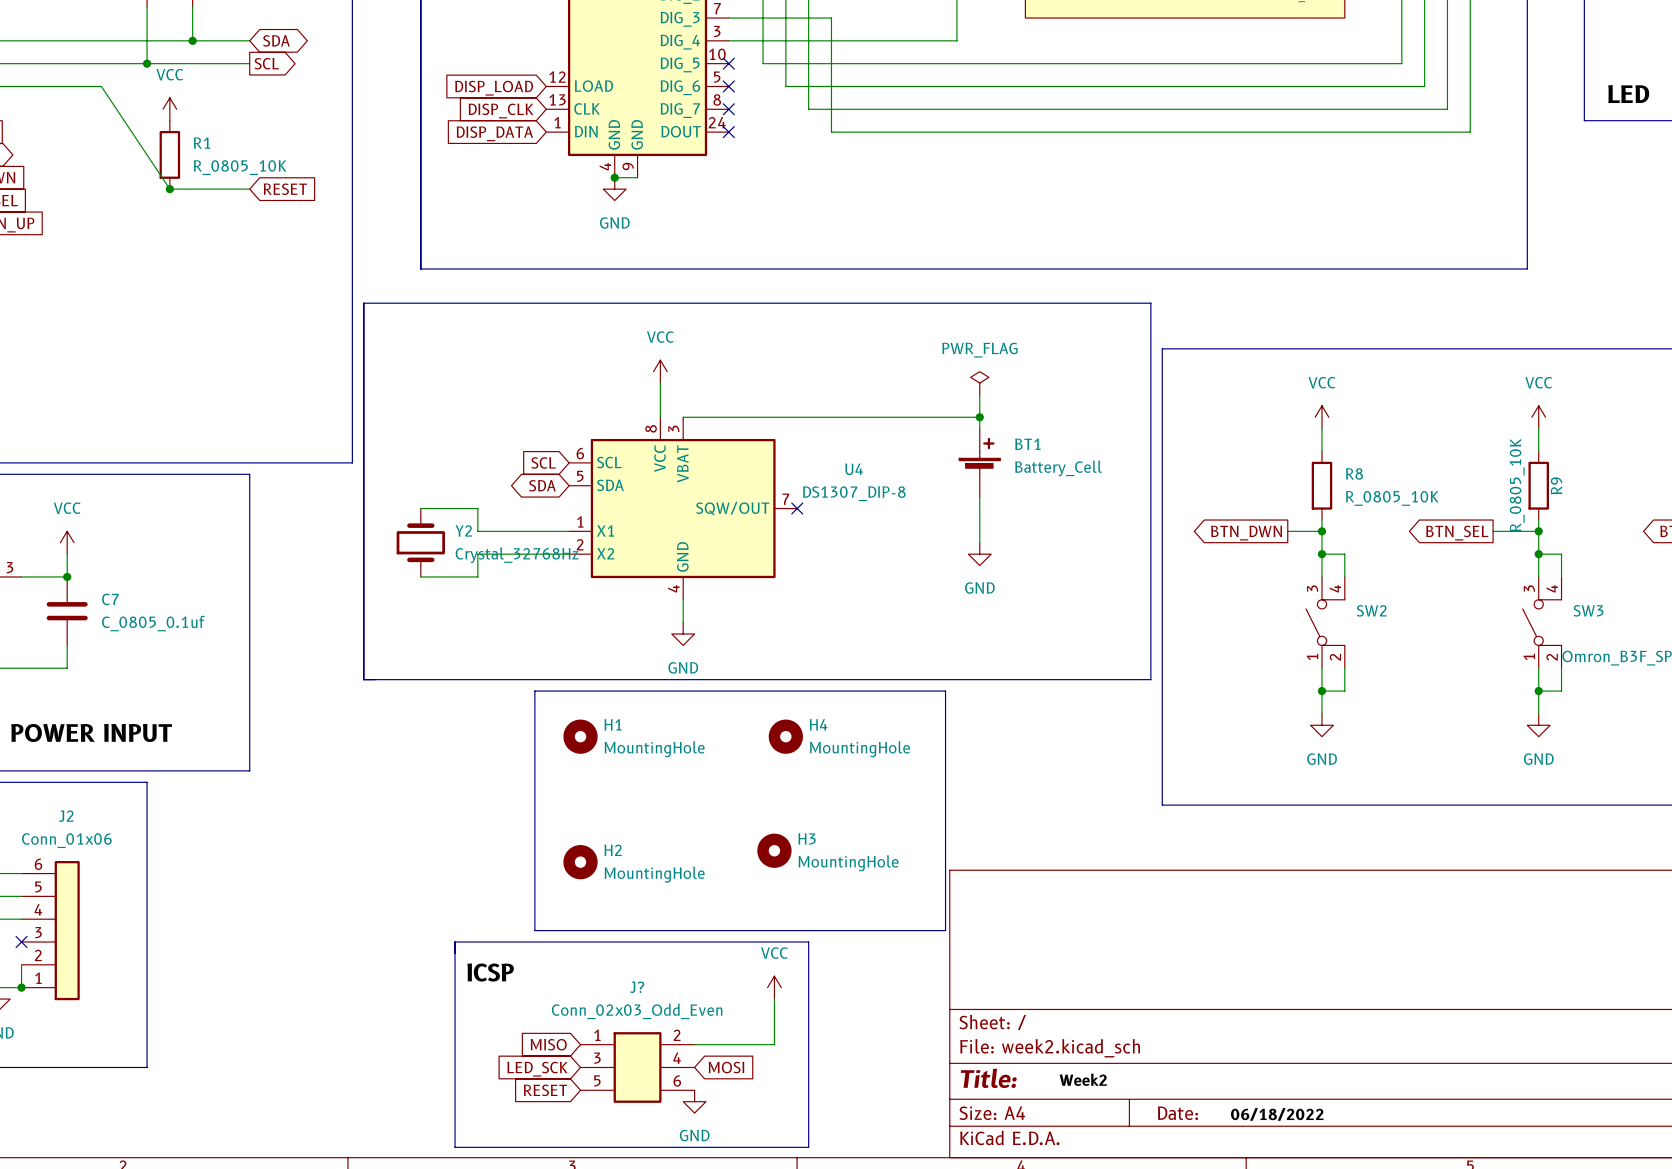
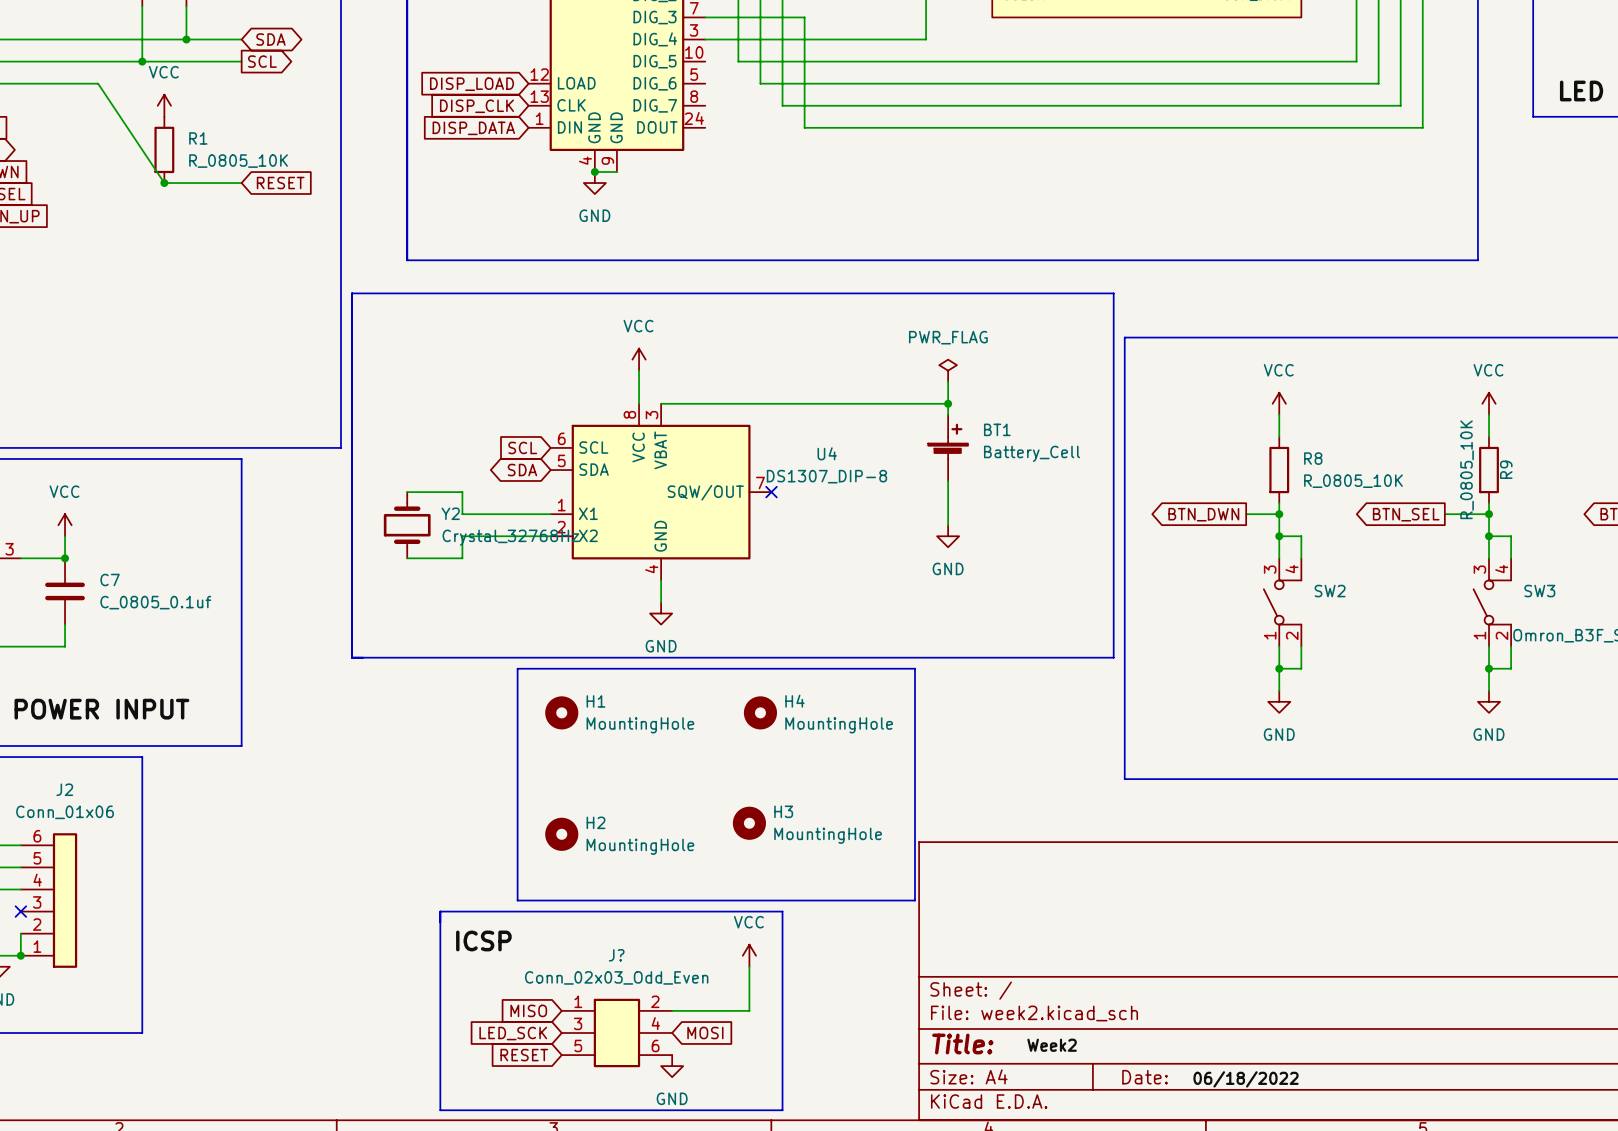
no-connect mark: (728, 63) -> none
no-connect mark: (728, 86) -> none
no-connect mark: (728, 109) -> none
no-connect mark: (728, 132) -> none

